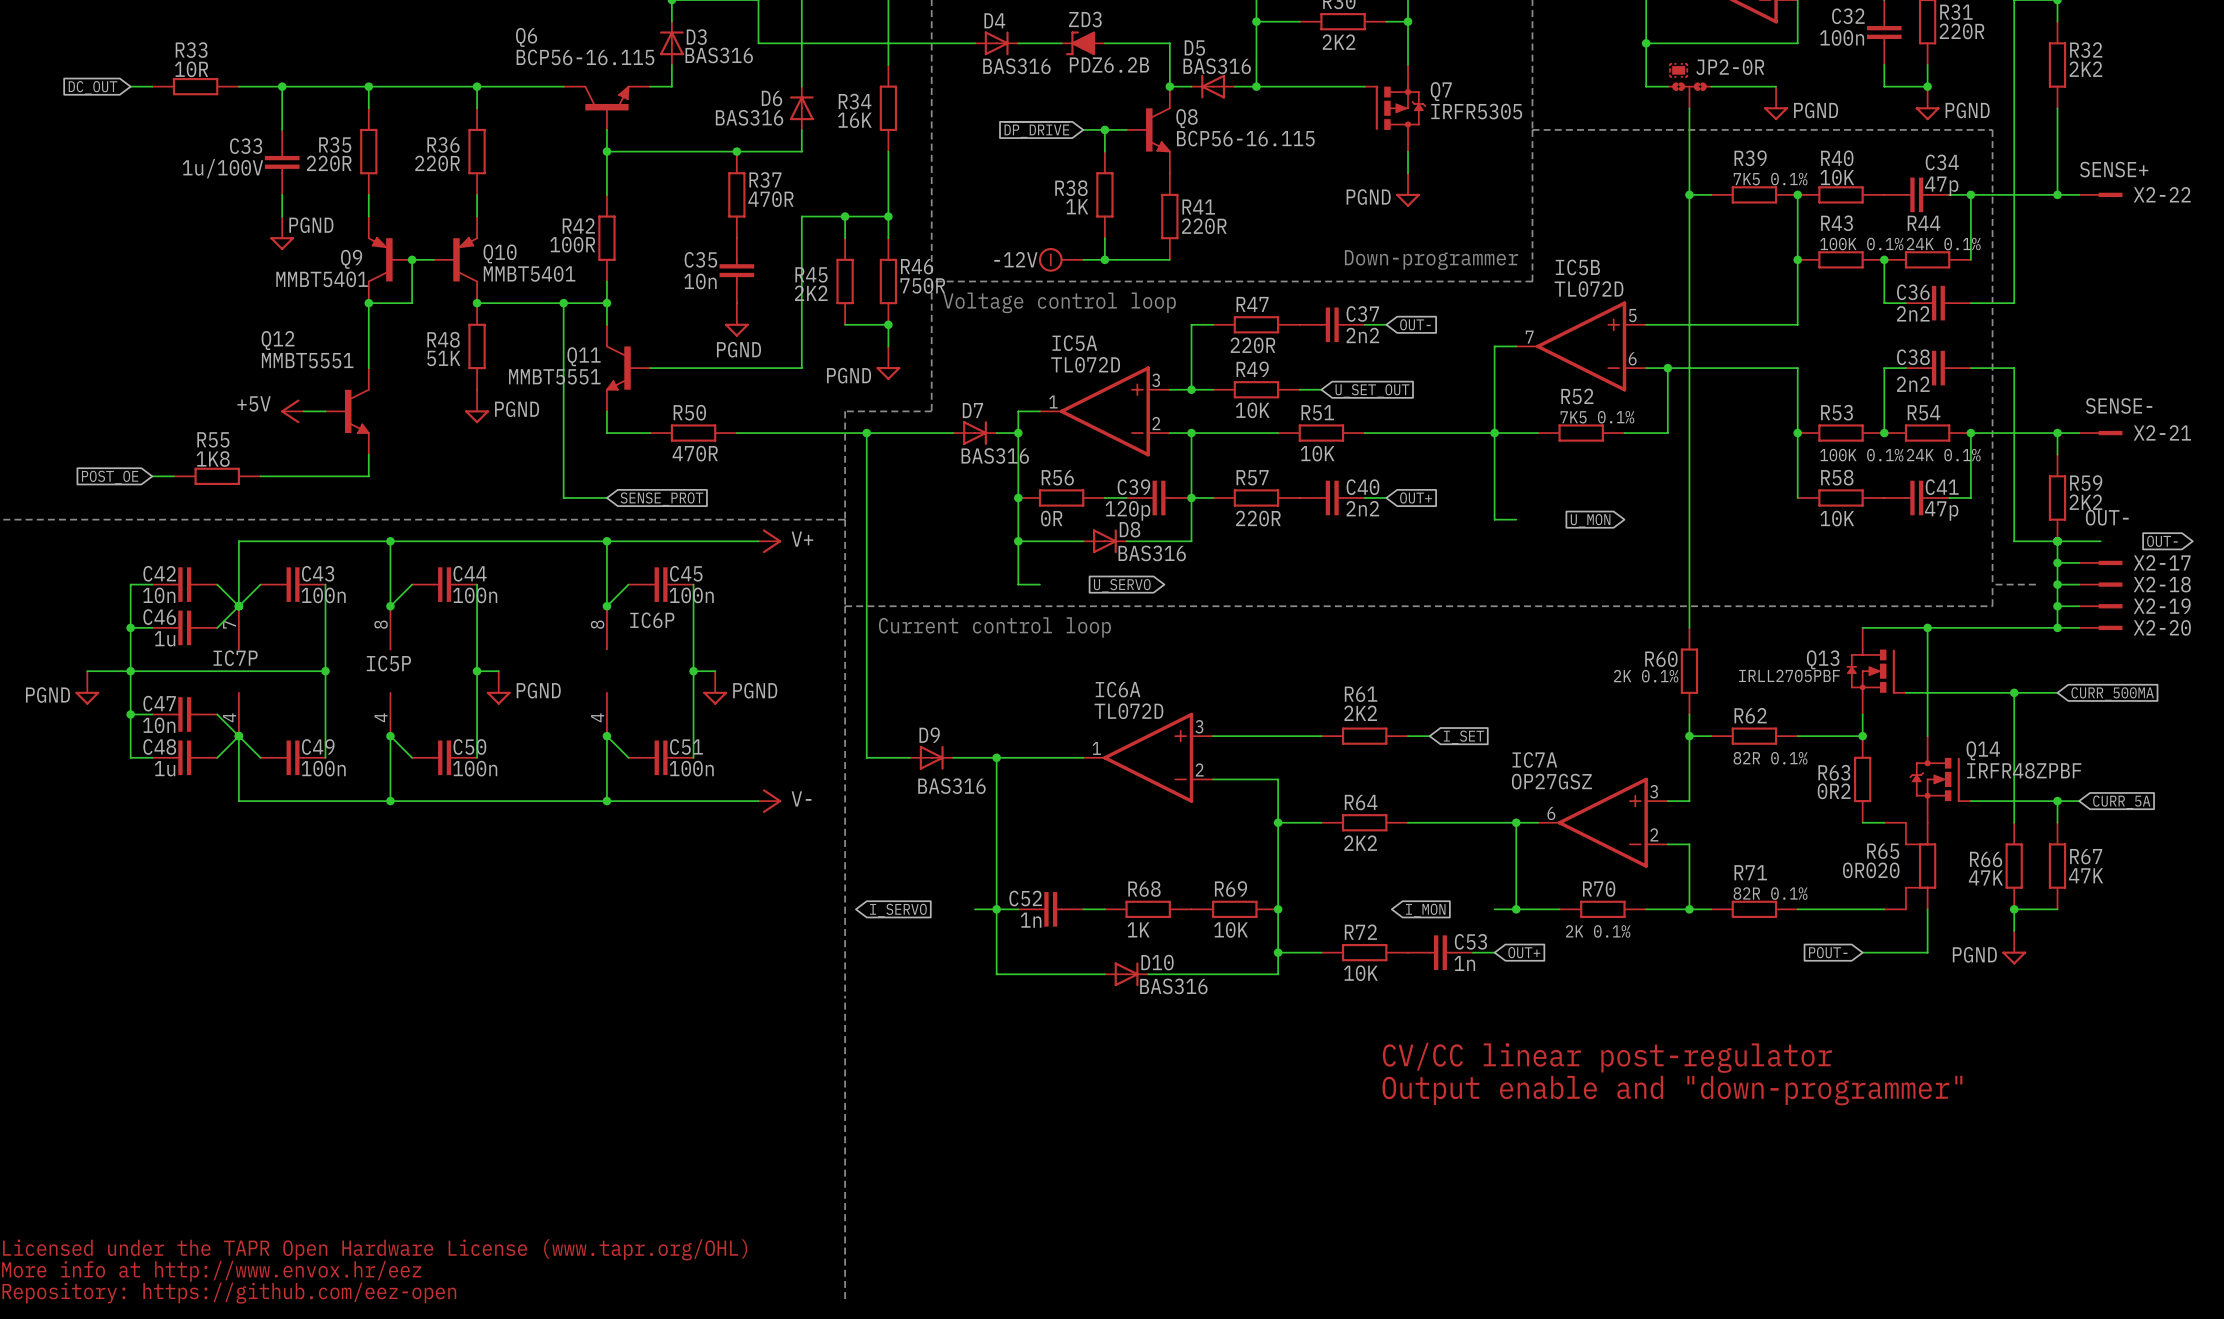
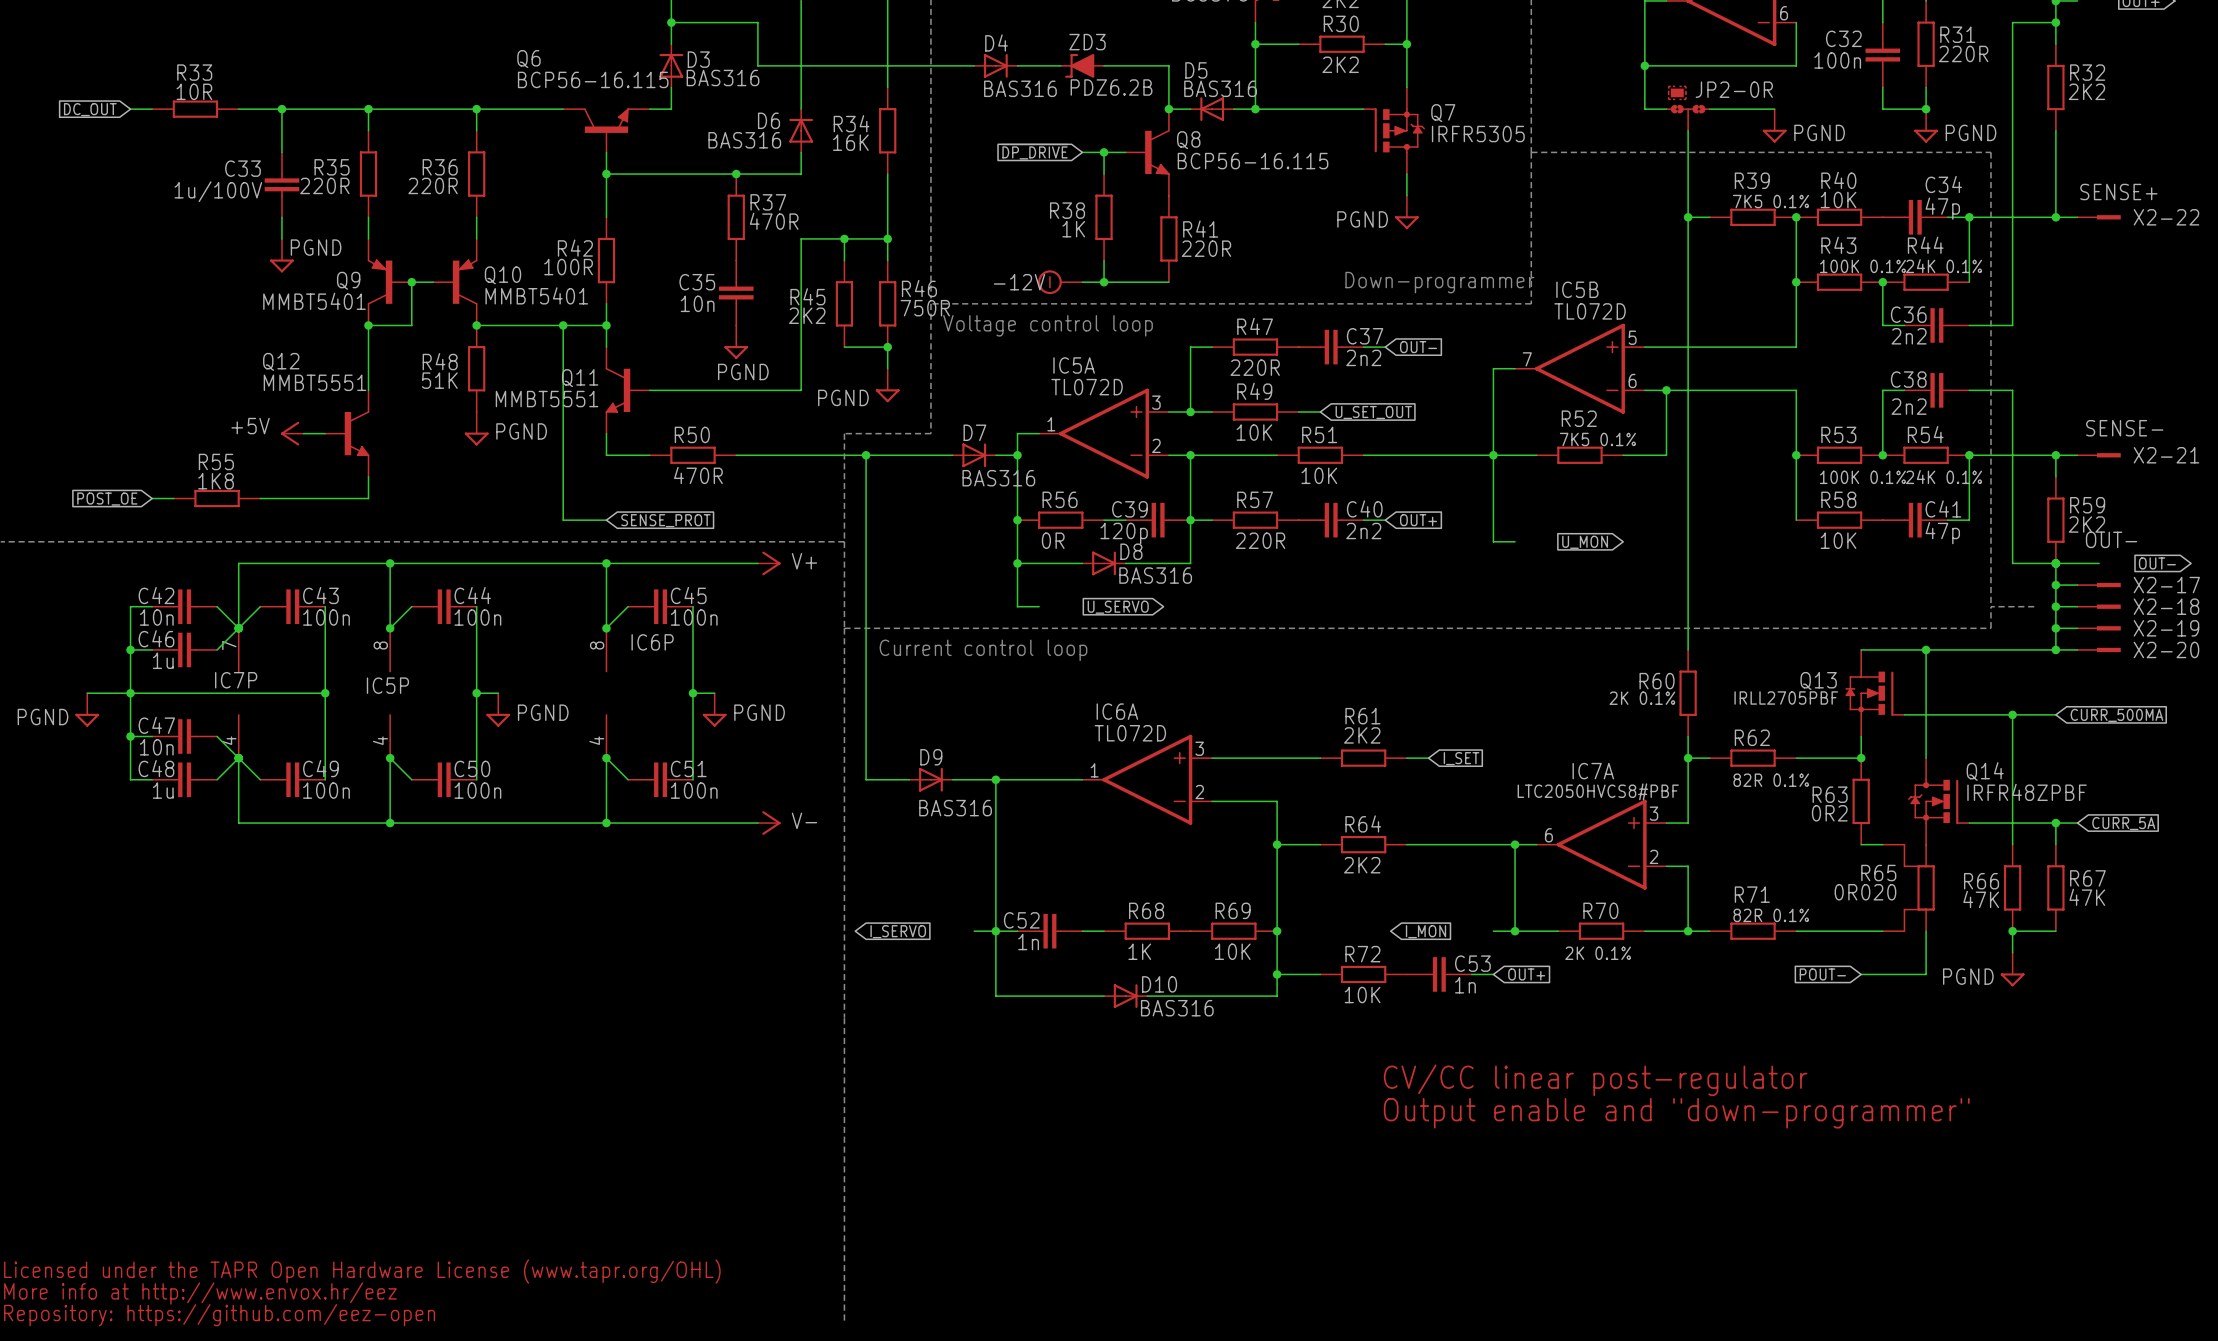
IC7A name position: IC7A (1534, 759) -> IC7A (1593, 771)
IC7A value: OP27GSZ (1551, 781) -> LTC2050HVCS8#PBF (1598, 791)

